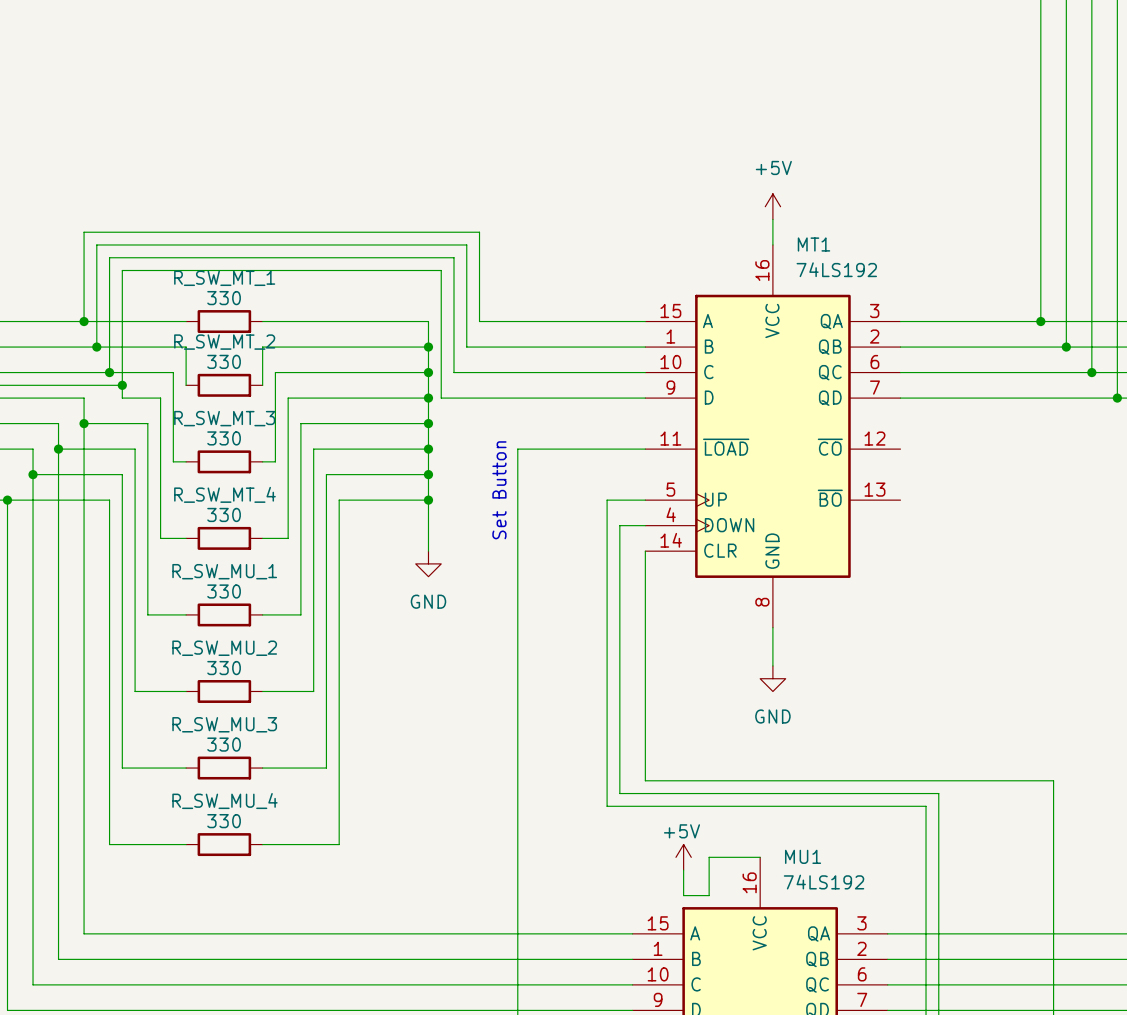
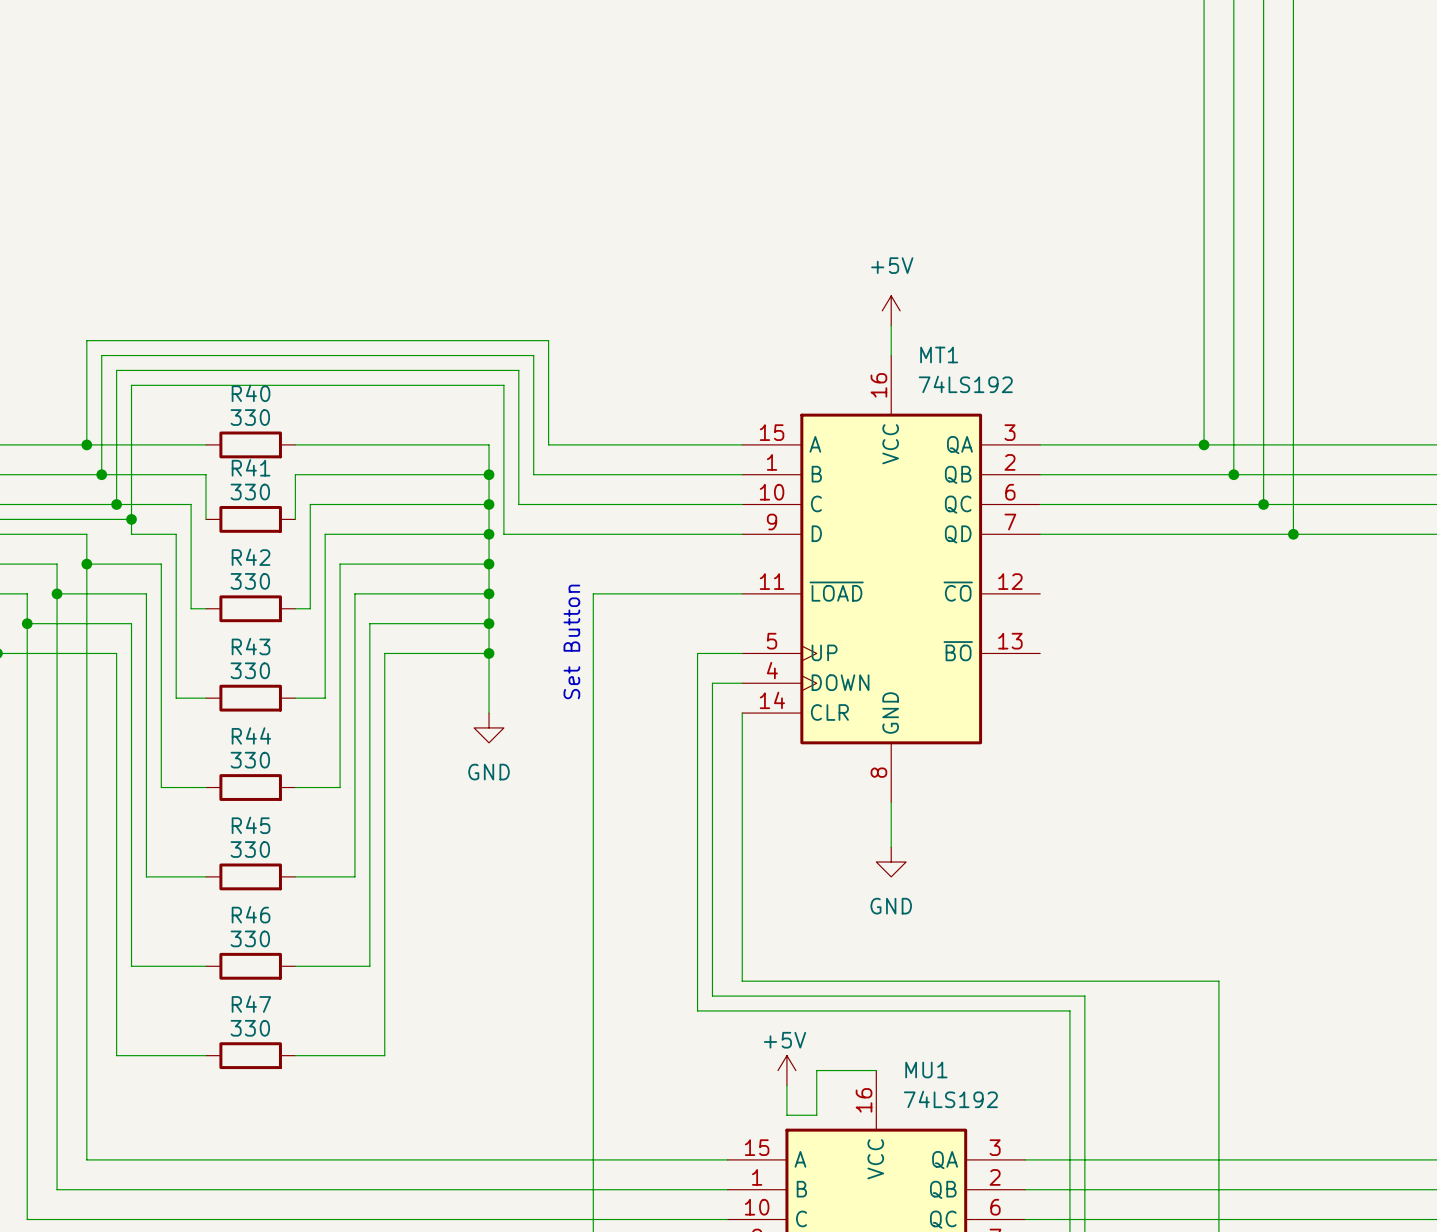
R_SW_MT_1 name: R_SW_MT_1 (224, 278) -> R40 (251, 393)
R_SW_MT_2 name: R_SW_MT_2 (224, 342) -> R41 (251, 467)
R_SW_MT_3 name: R_SW_MT_3 (224, 418) -> R42 (251, 557)
R_SW_MT_4 name: R_SW_MT_4 (224, 494) -> R43 (251, 646)
R_SW_MU_1 name: R_SW_MU_1 (224, 571) -> R44 (251, 735)
R_SW_MU_2 name: R_SW_MU_2 (224, 648) -> R45 (251, 825)
R_SW_MU_3 name: R_SW_MU_3 (224, 724) -> R46 (251, 914)
R_SW_MU_4 name: R_SW_MU_4 (224, 801) -> R47 (251, 1004)

